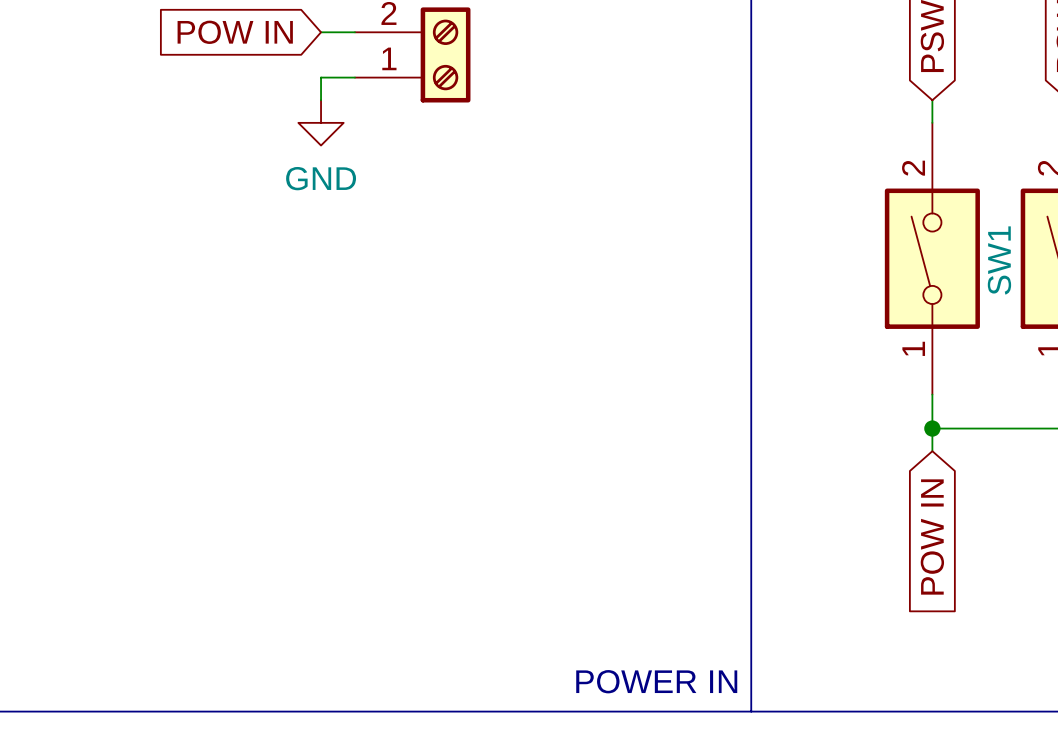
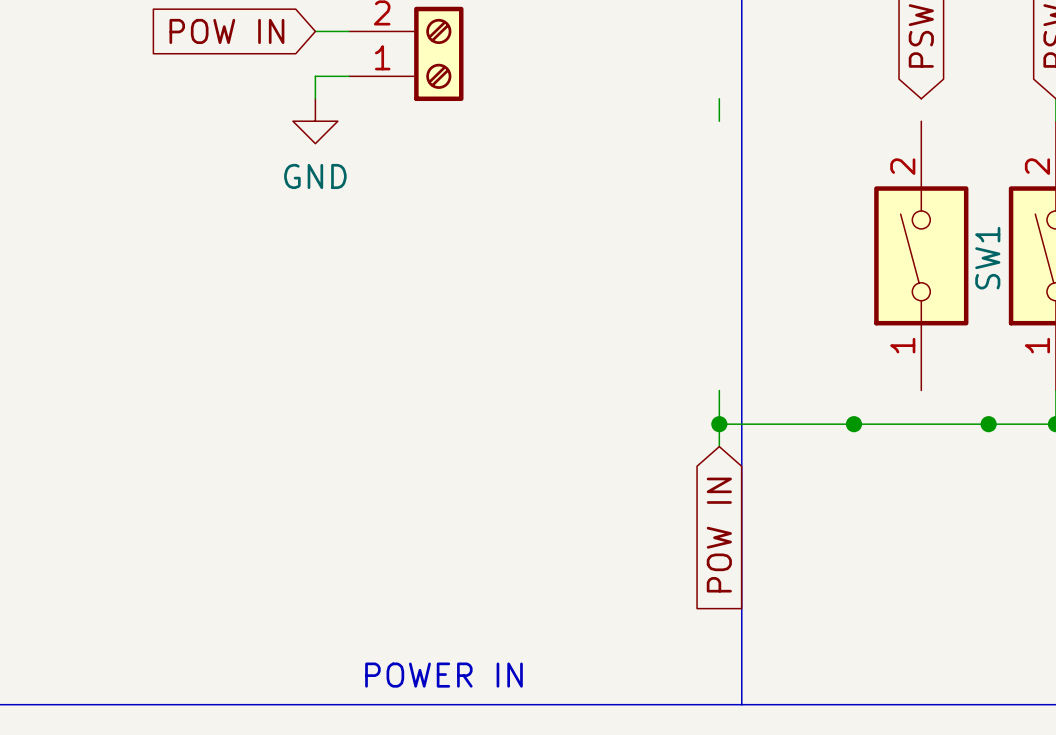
wire: (932, 100) (932, 122) -> (719, 98) (719, 121)
wire: (932, 394) (932, 451) -> (719, 390) (719, 446)
wire: none -> (719, 424) (921, 424)
junction: none -> (719, 424)
junction: none -> (853, 424)
junction: (932, 428) -> none
junction: none -> (988, 424)
global label position: POW IN (932, 536) -> POW IN (719, 535)
text position: POWER IN (656, 681) -> POWER IN (443, 675)

